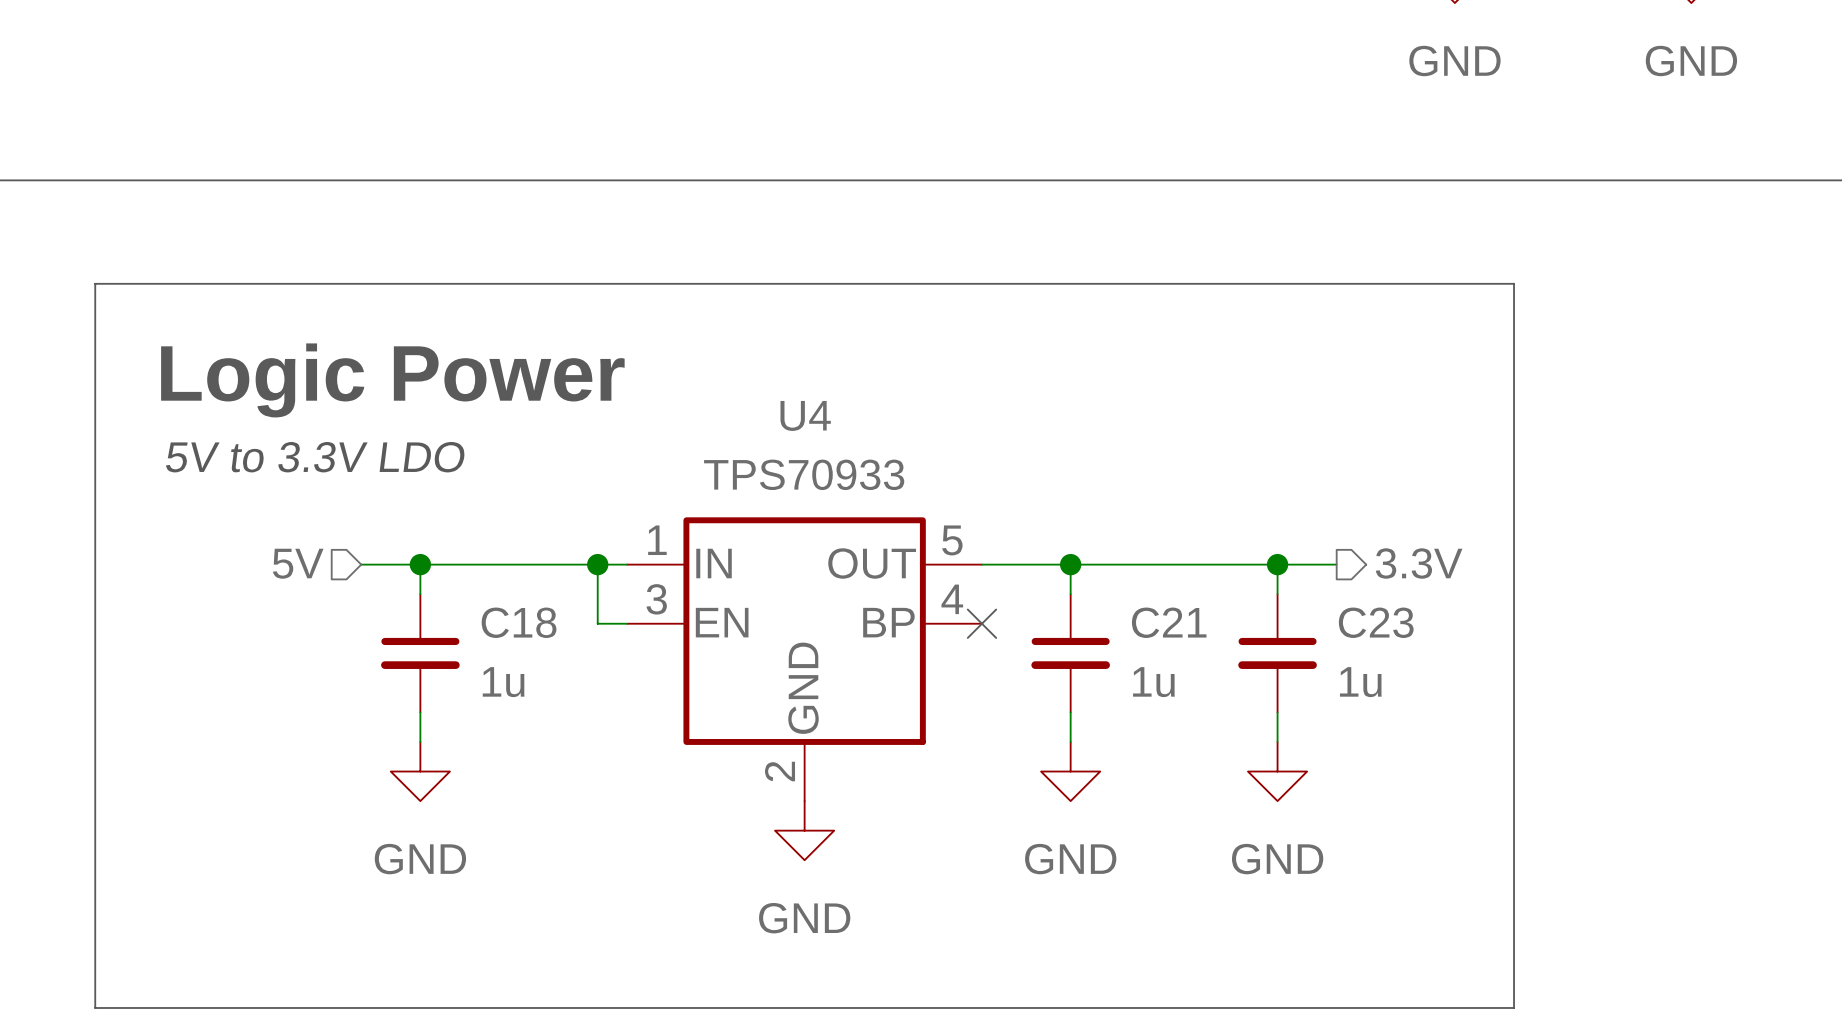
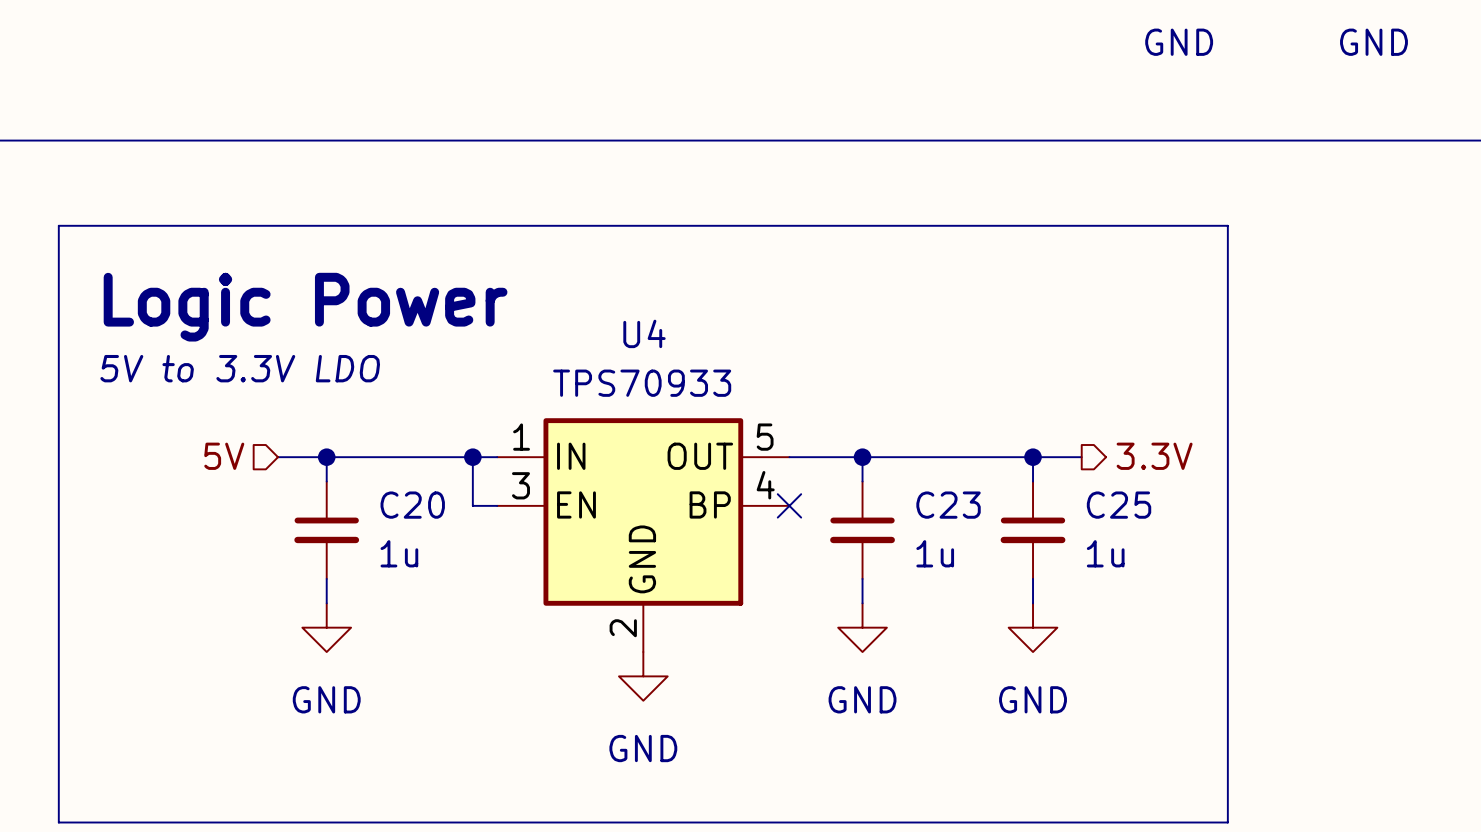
C18 name: C18 (519, 622) -> C20 (412, 505)
C21 name: C21 (1169, 622) -> C23 (948, 505)
C23 name: C23 (1376, 622) -> C25 (1119, 505)

